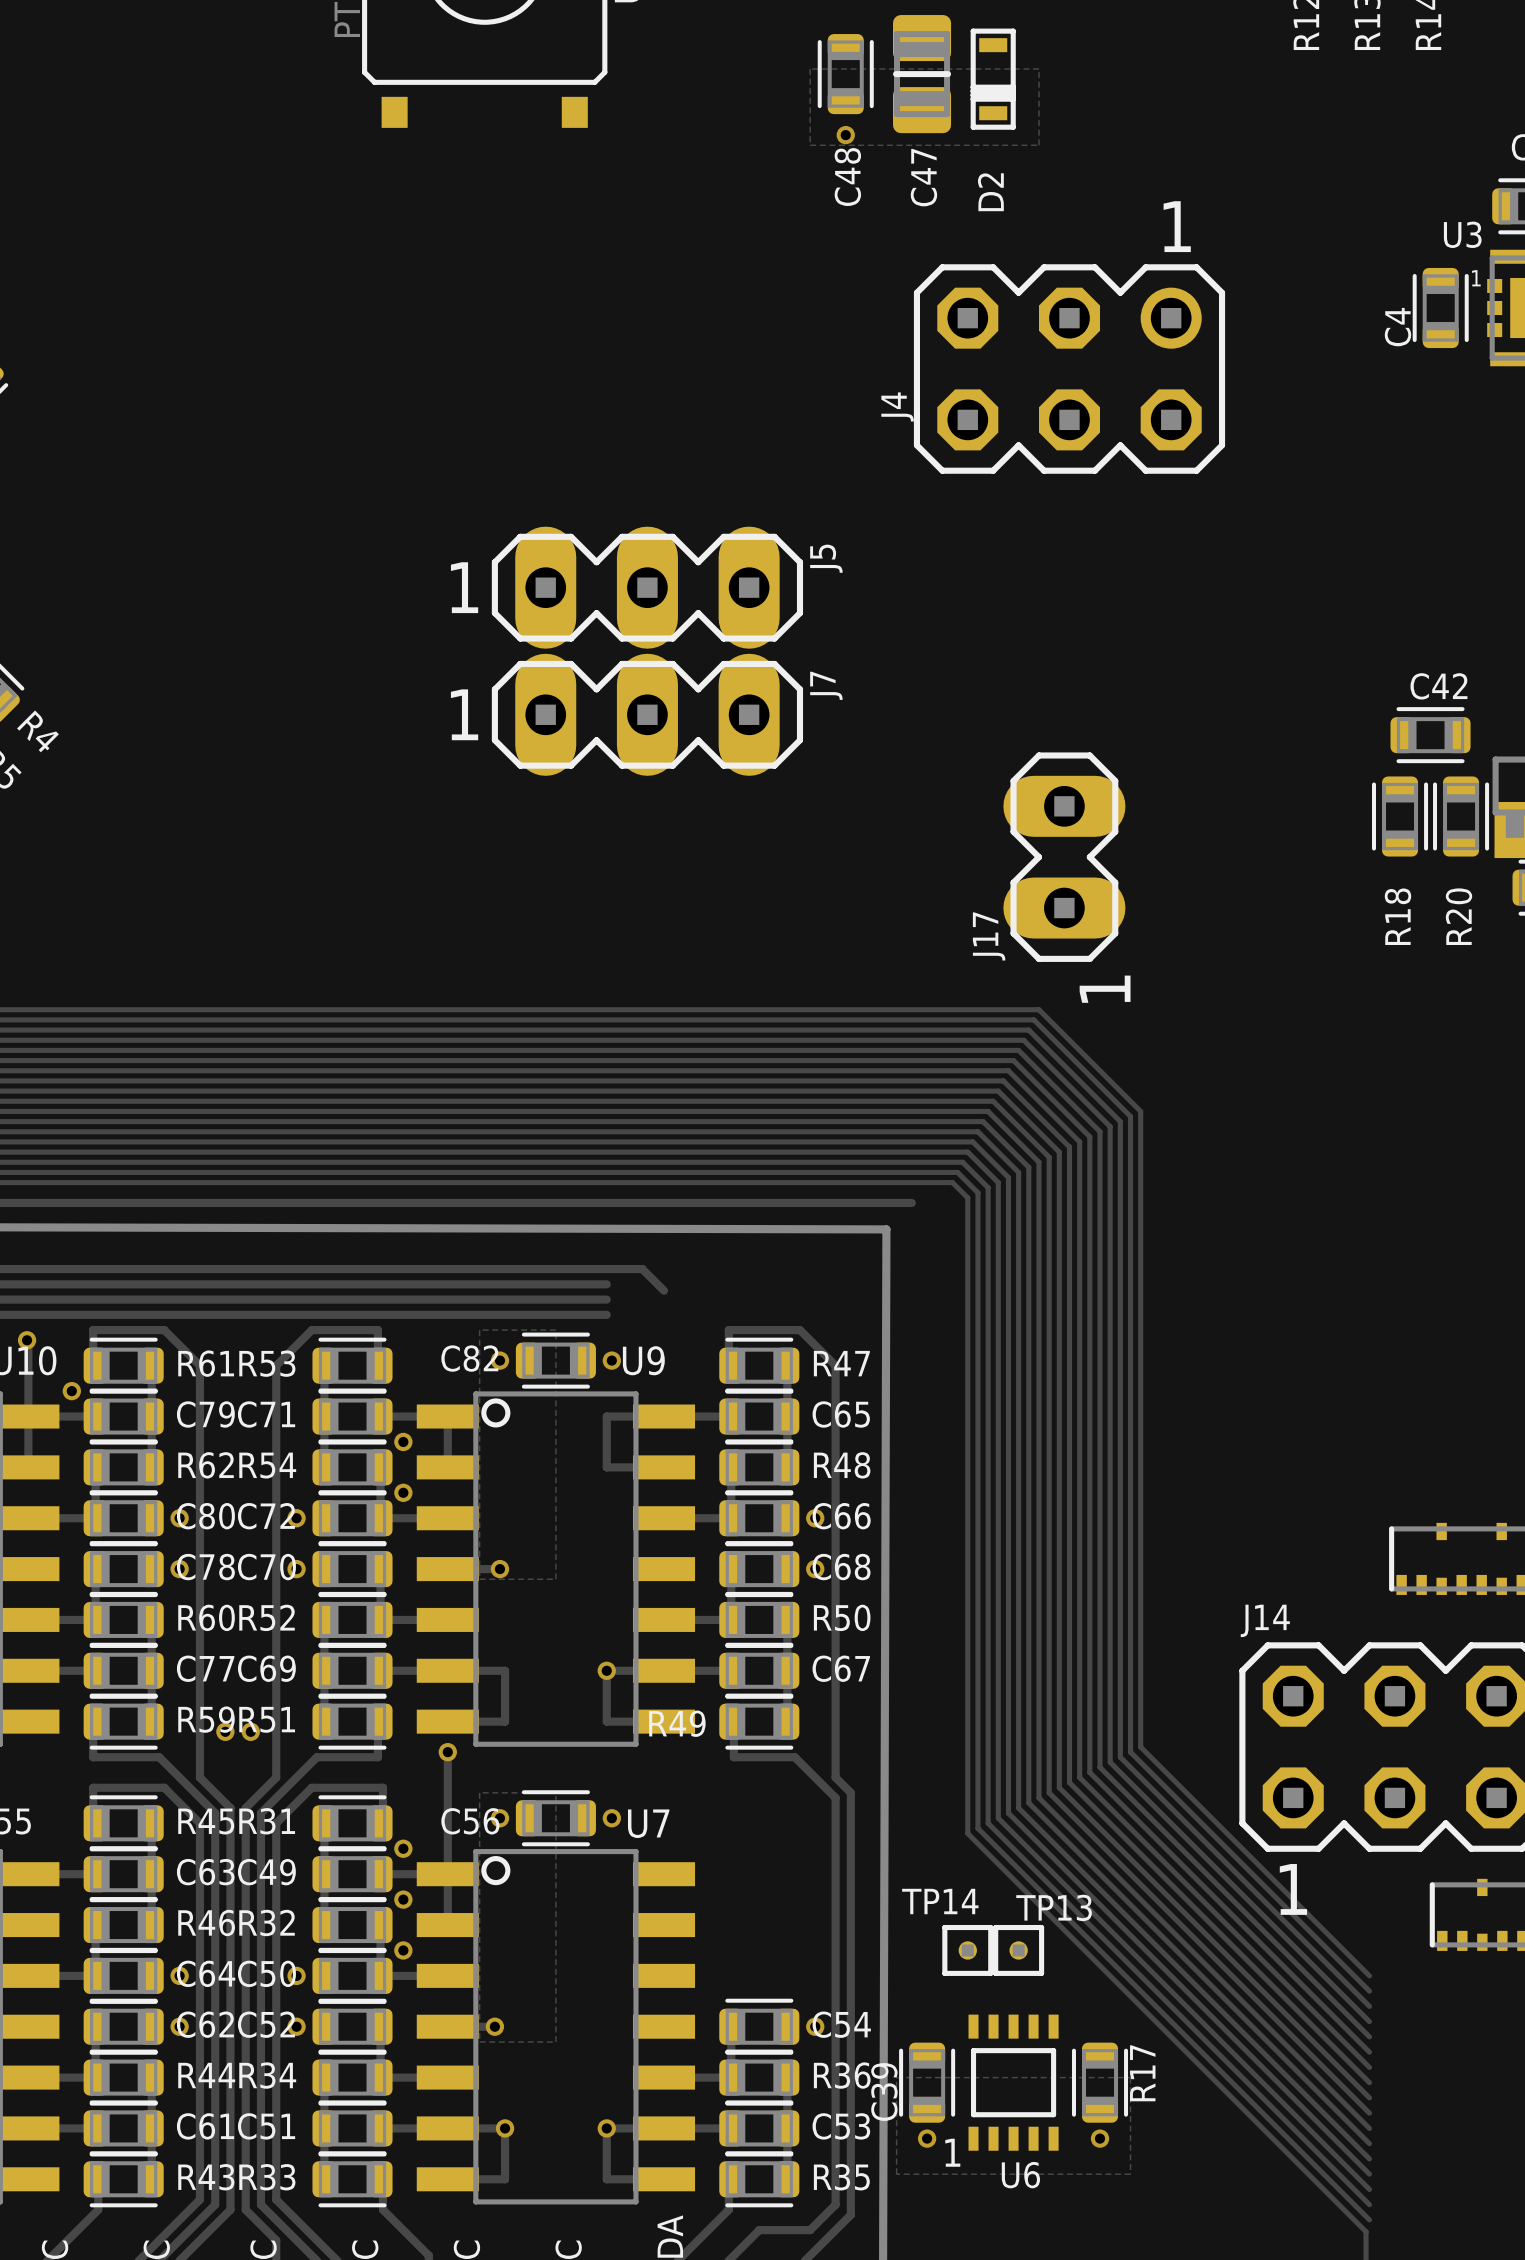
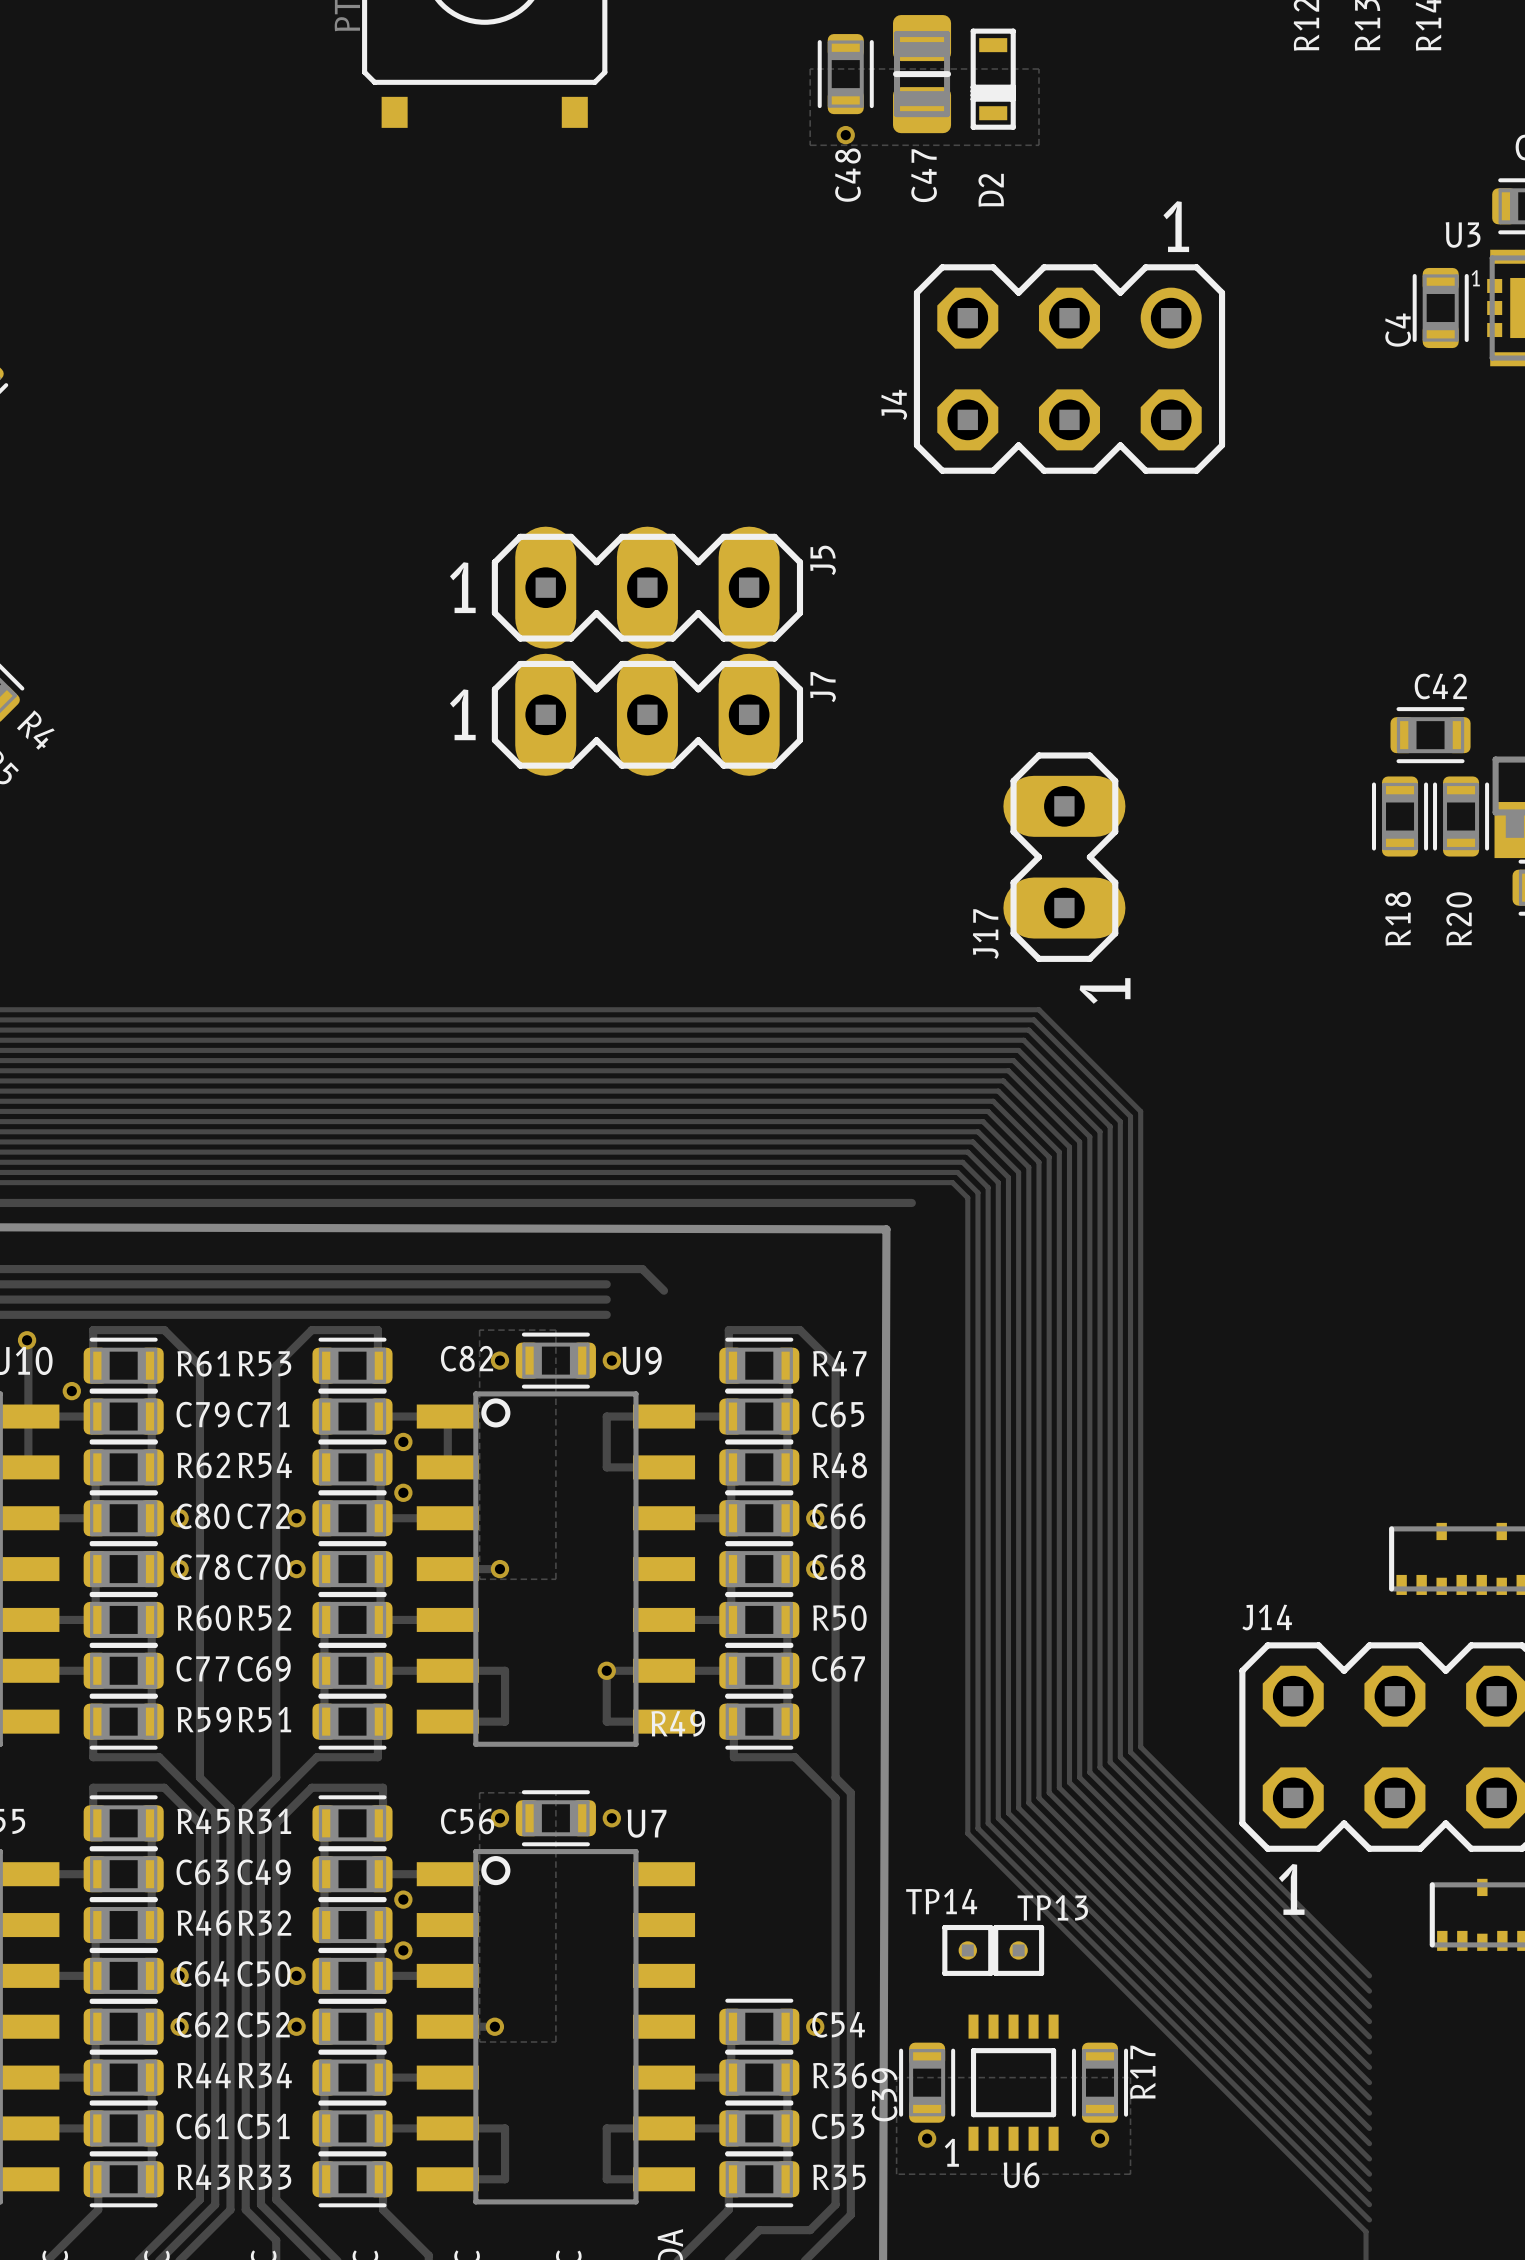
via: (225, 1731) -> none
via: (250, 1731) -> none
track: (447, 1752) (447, 1925) -> none
via: (447, 1752) -> none
via: (403, 1848) -> none
via: (505, 2128) -> none
via: (606, 2128) -> none

